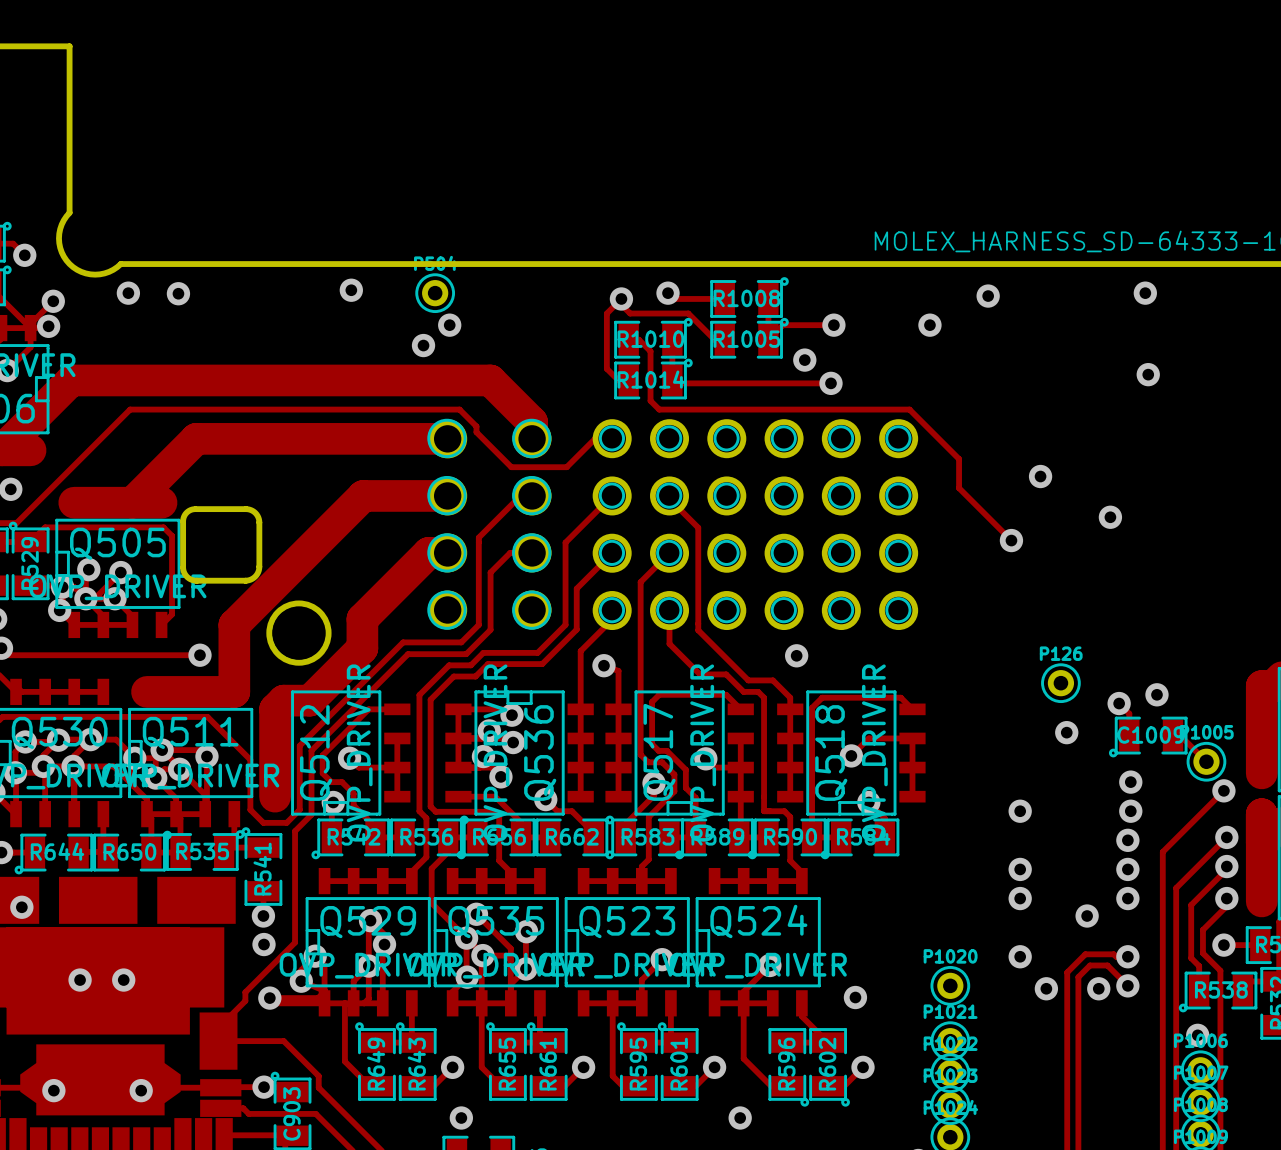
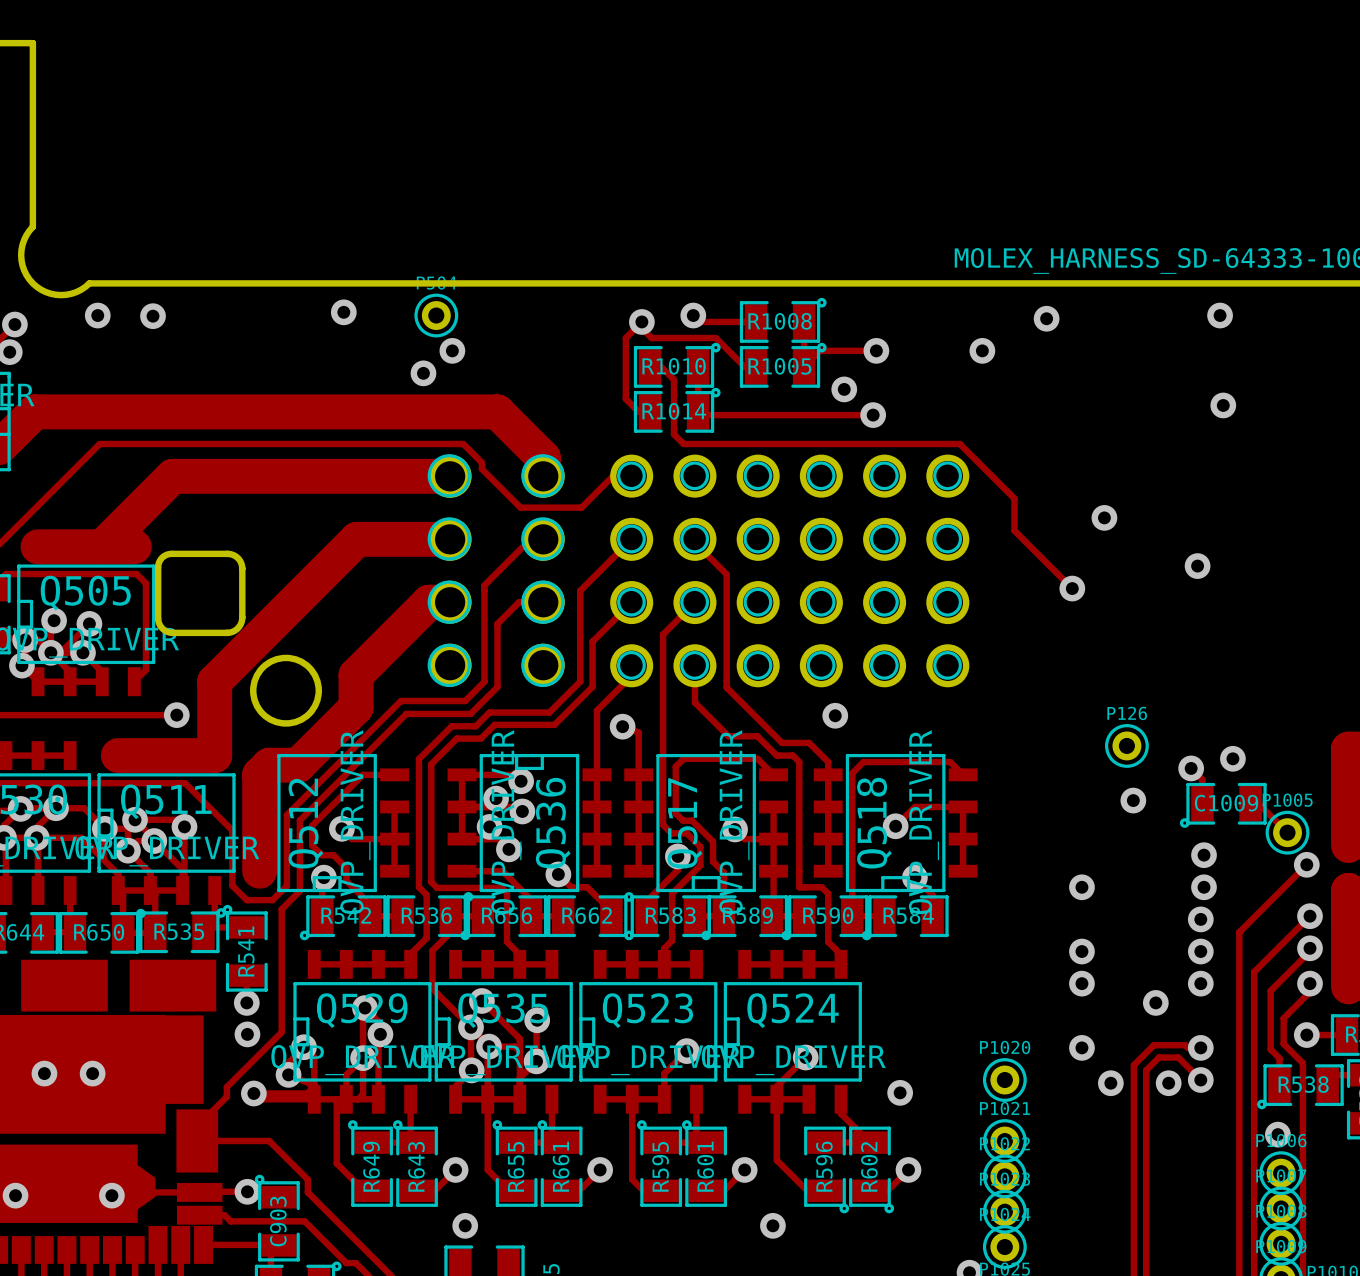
via position: (1110, 517) -> (1197, 566)

